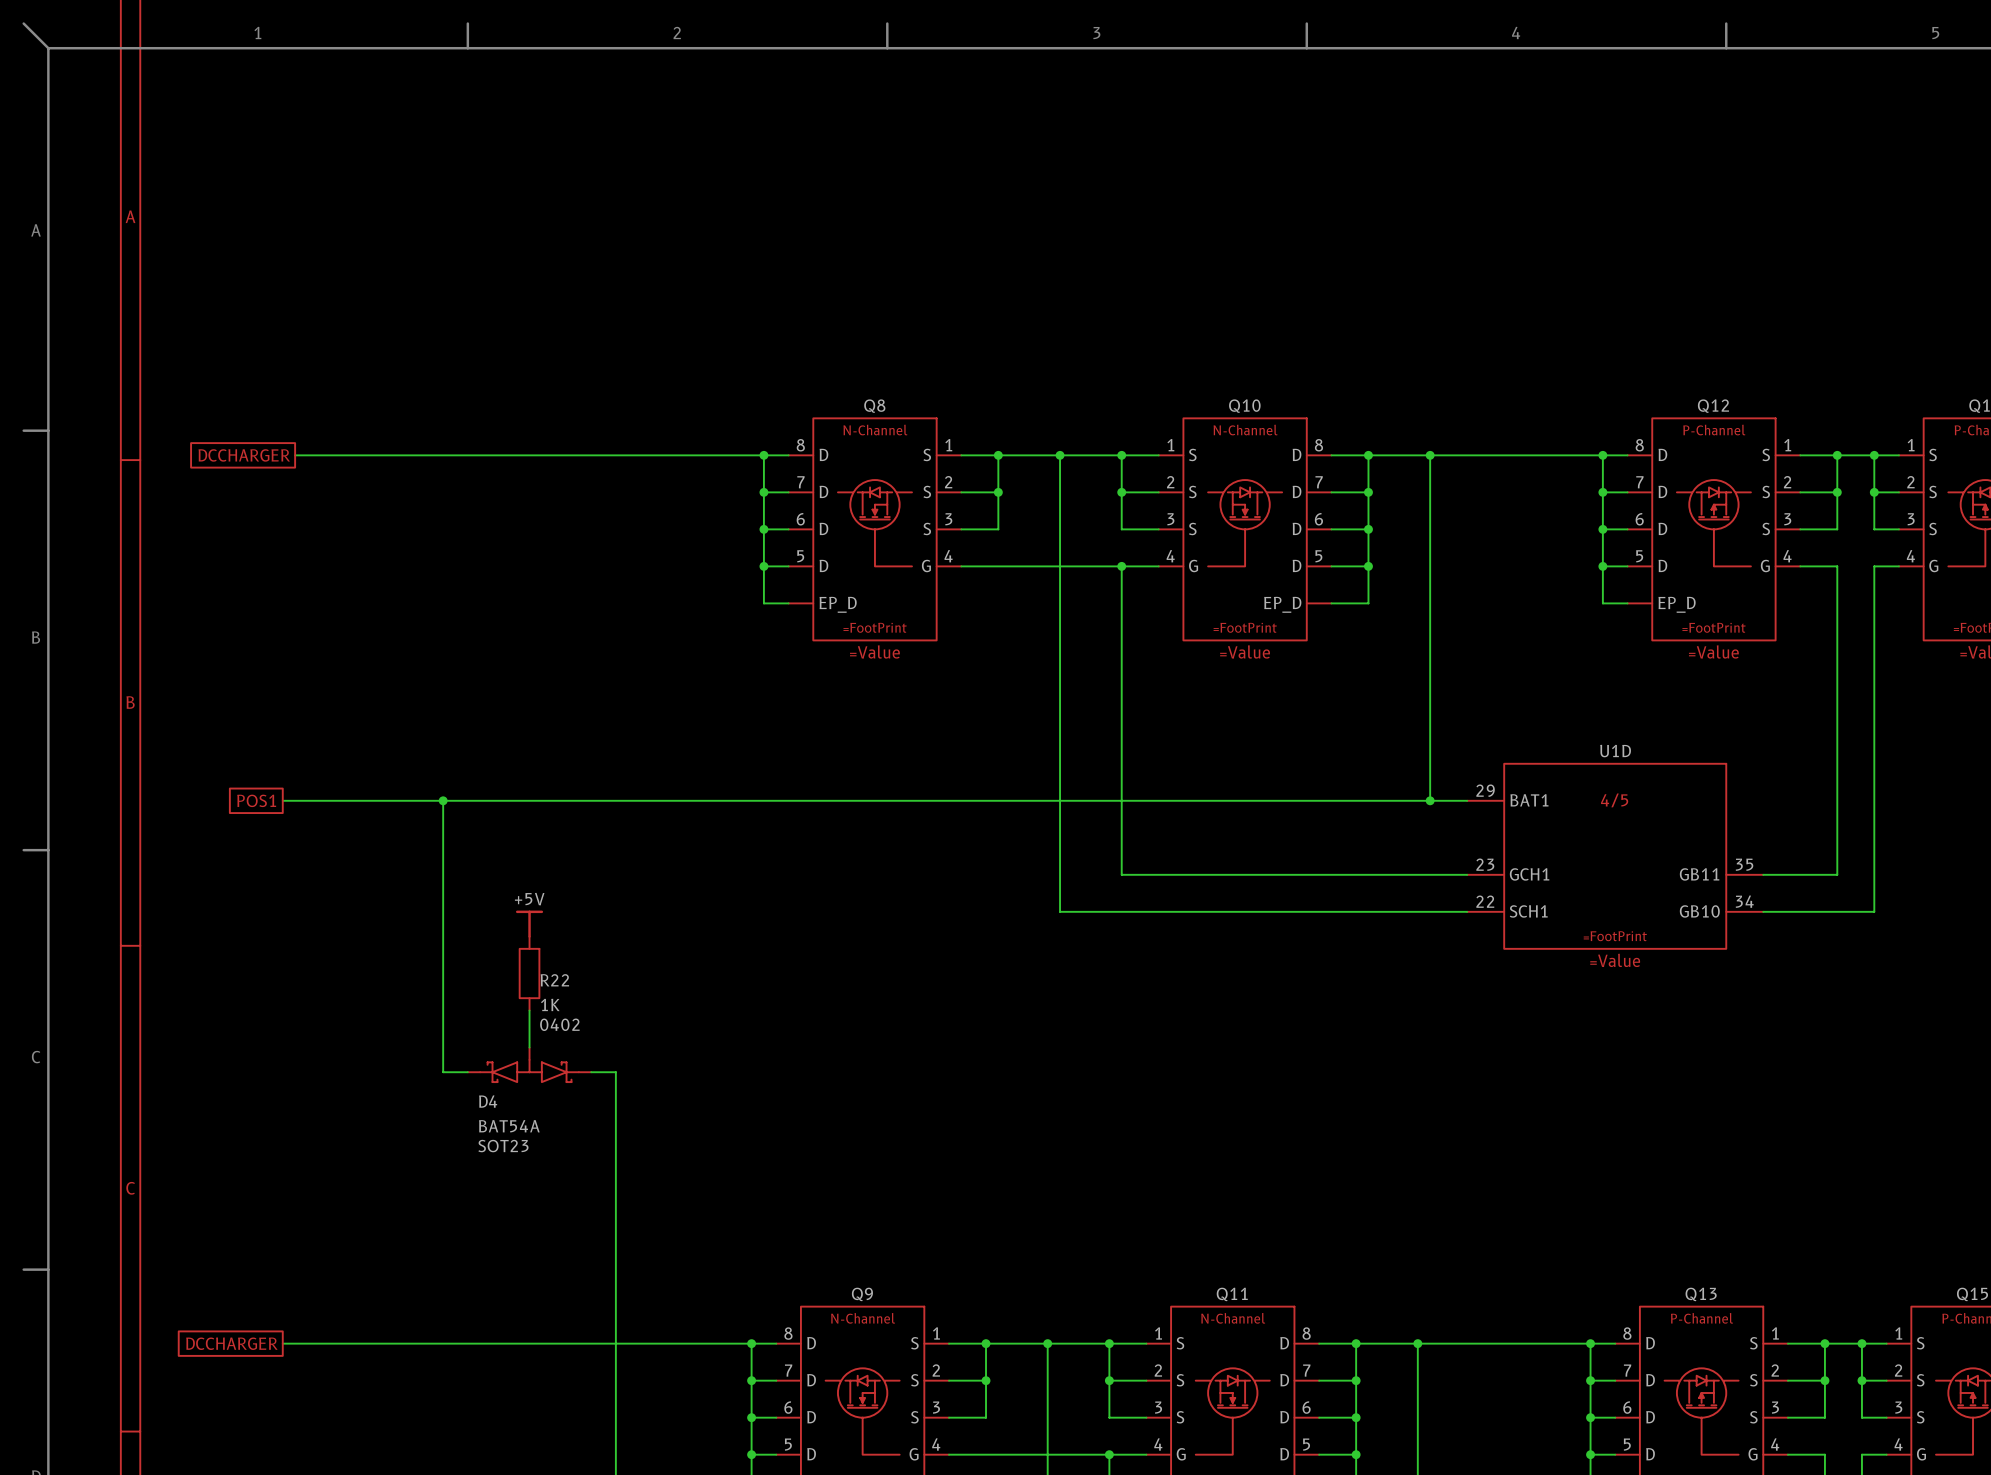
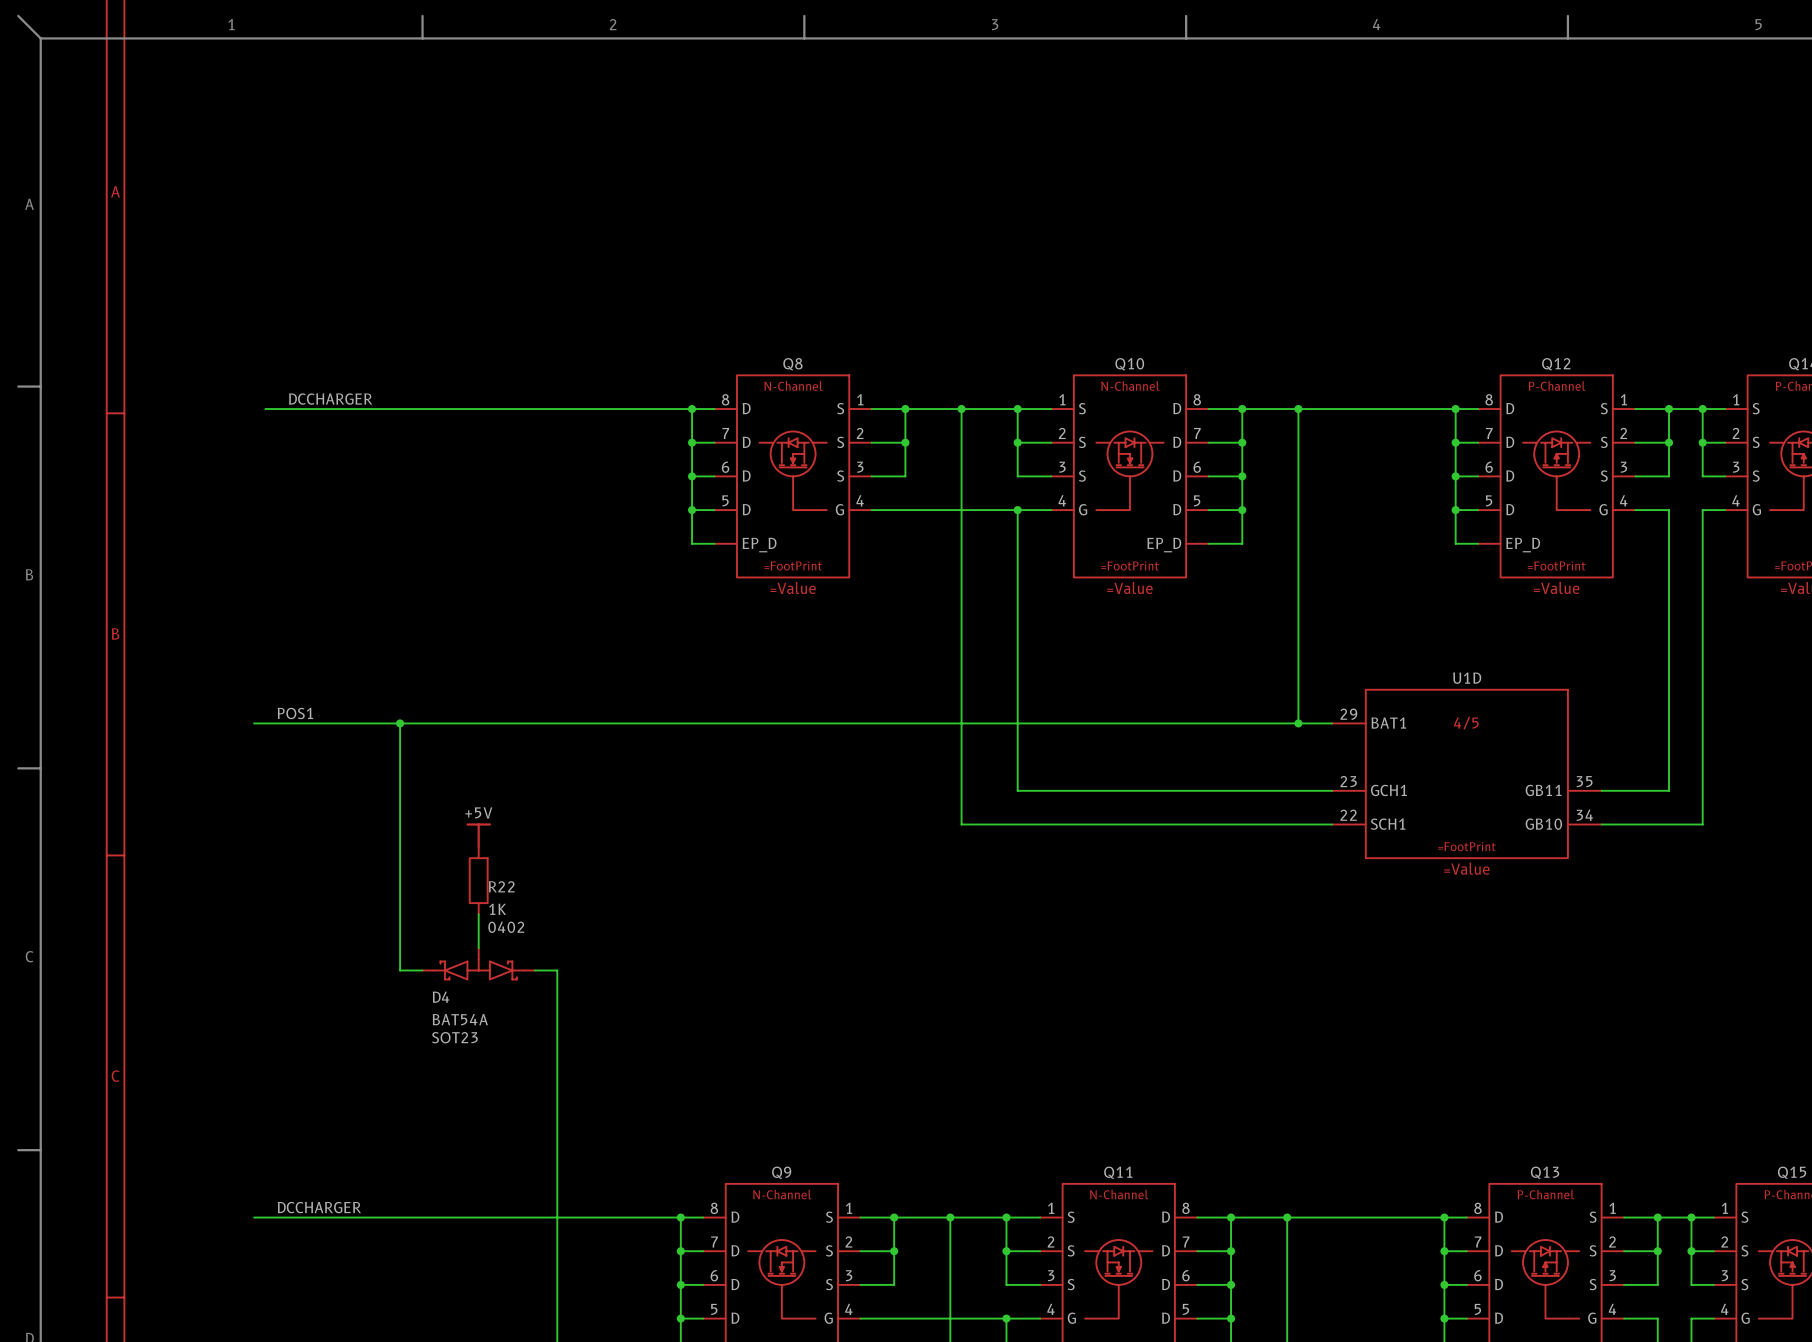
label: none -> DCCHARGER (330, 399)
global label: DCCHARGER (244, 455) -> none
label: none -> POS1 (295, 713)
global label: POS1 (256, 800) -> none
label: none -> DCCHARGER (319, 1207)
global label: DCCHARGER (231, 1343) -> none

